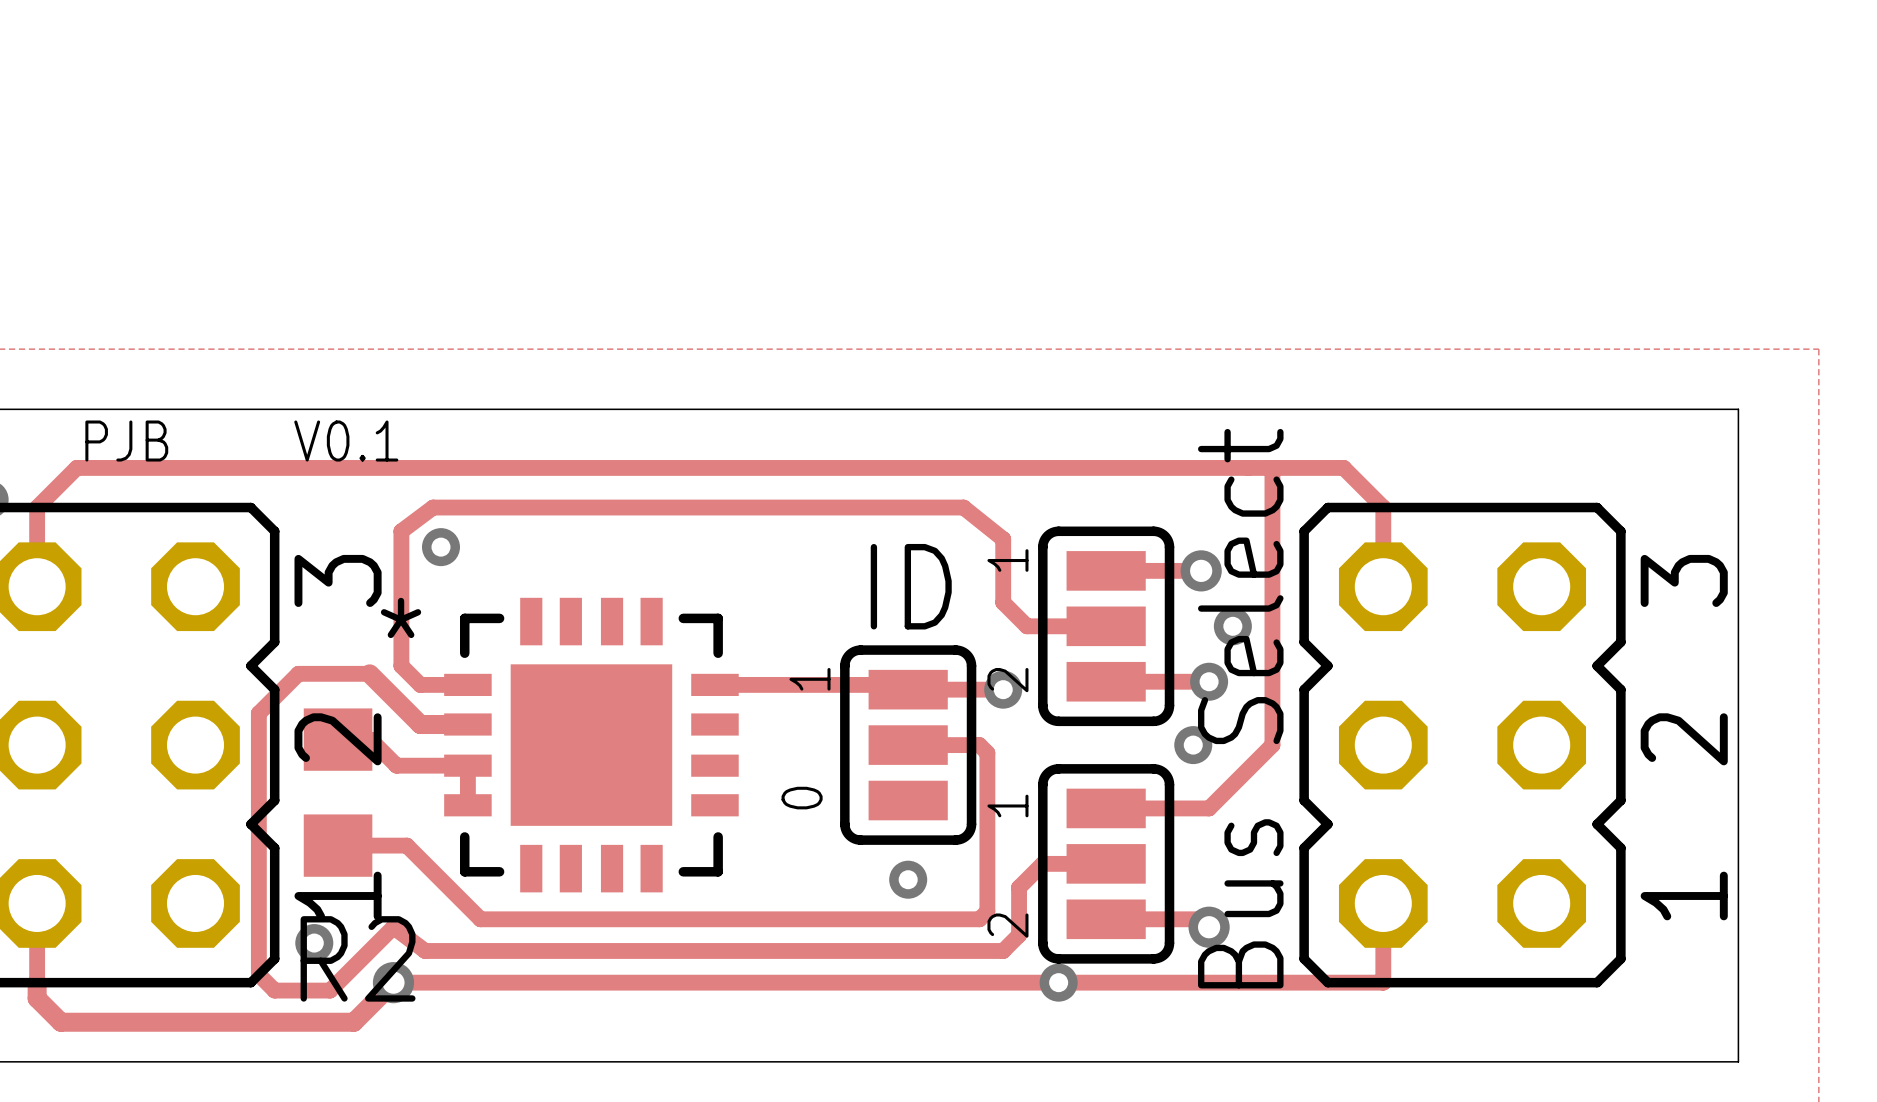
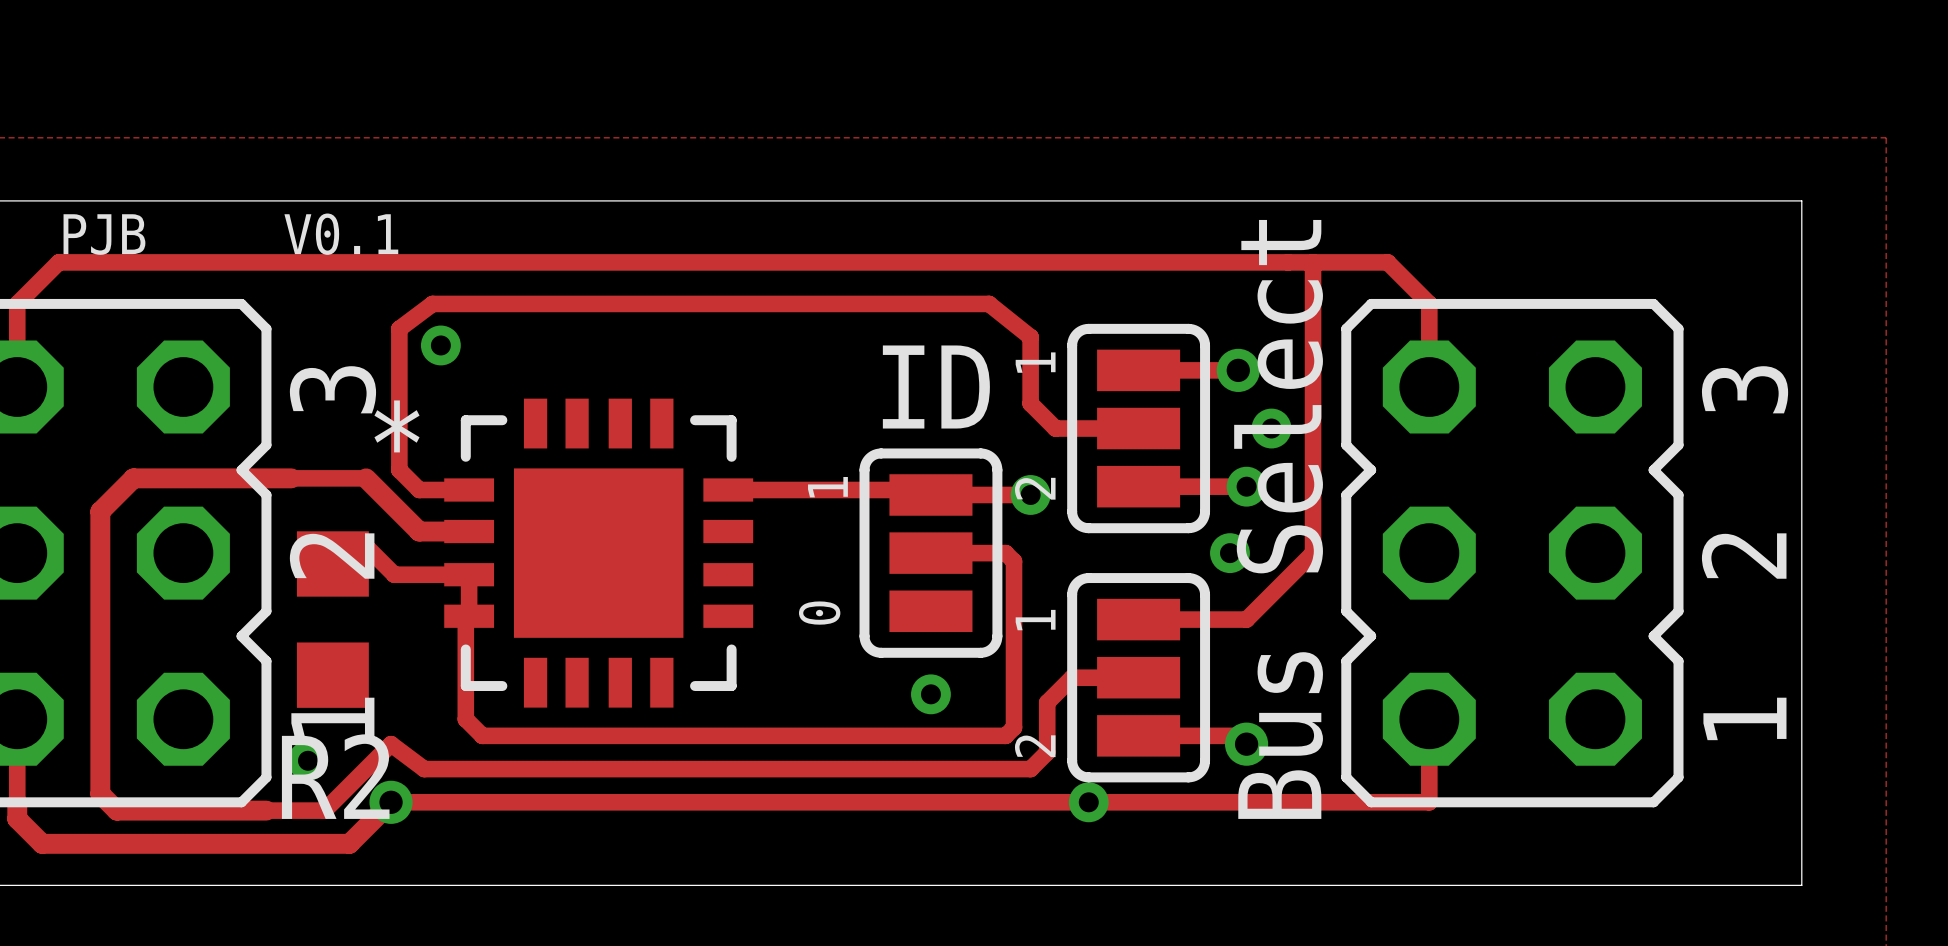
track: (298, 673) (258, 713) (258, 974) (274, 990) -> (291, 478) (133, 478) (100, 511) (100, 794) (116, 810) (266, 810)
R2 position: (338, 792) -> (332, 619)
track: (338, 845) (406, 845) (464, 903) -> (465, 619) (465, 719)

